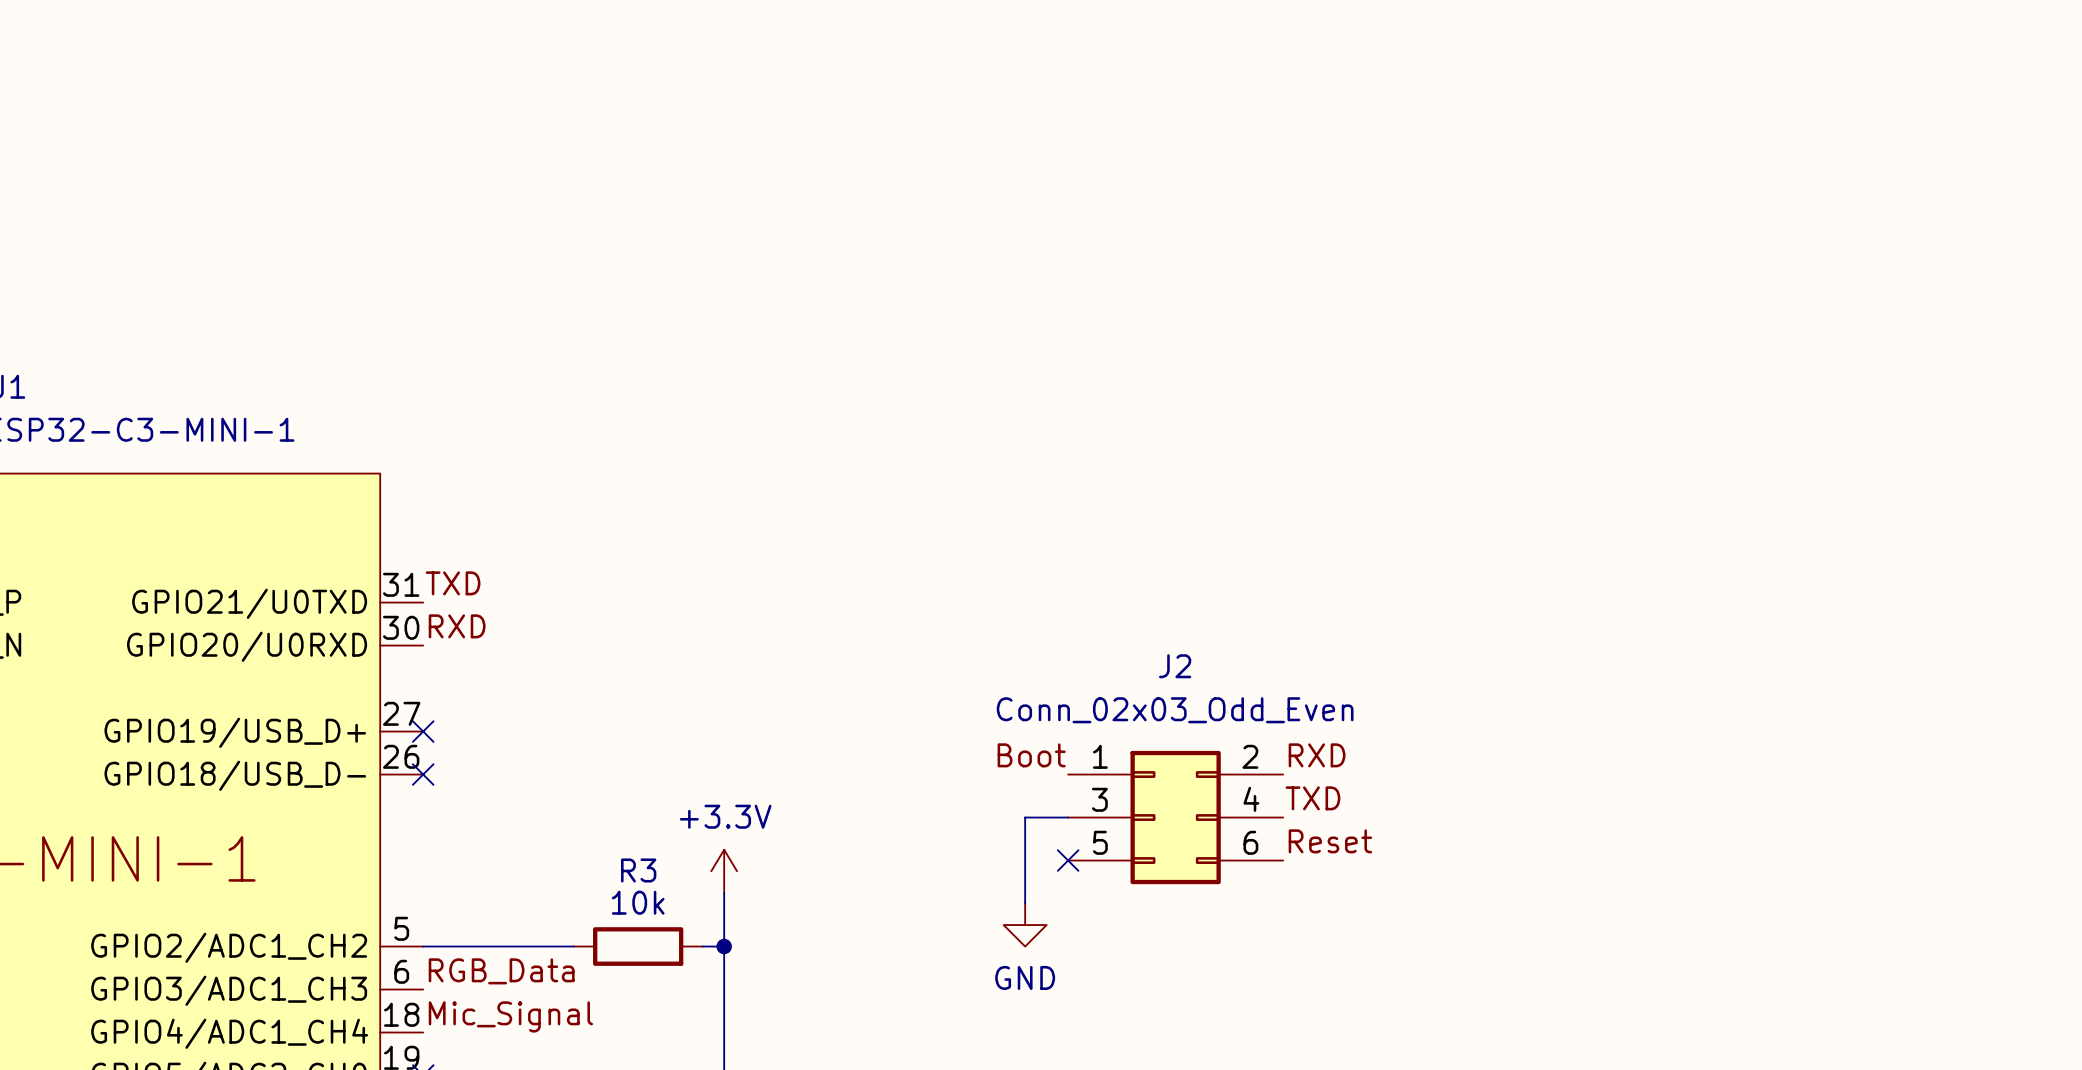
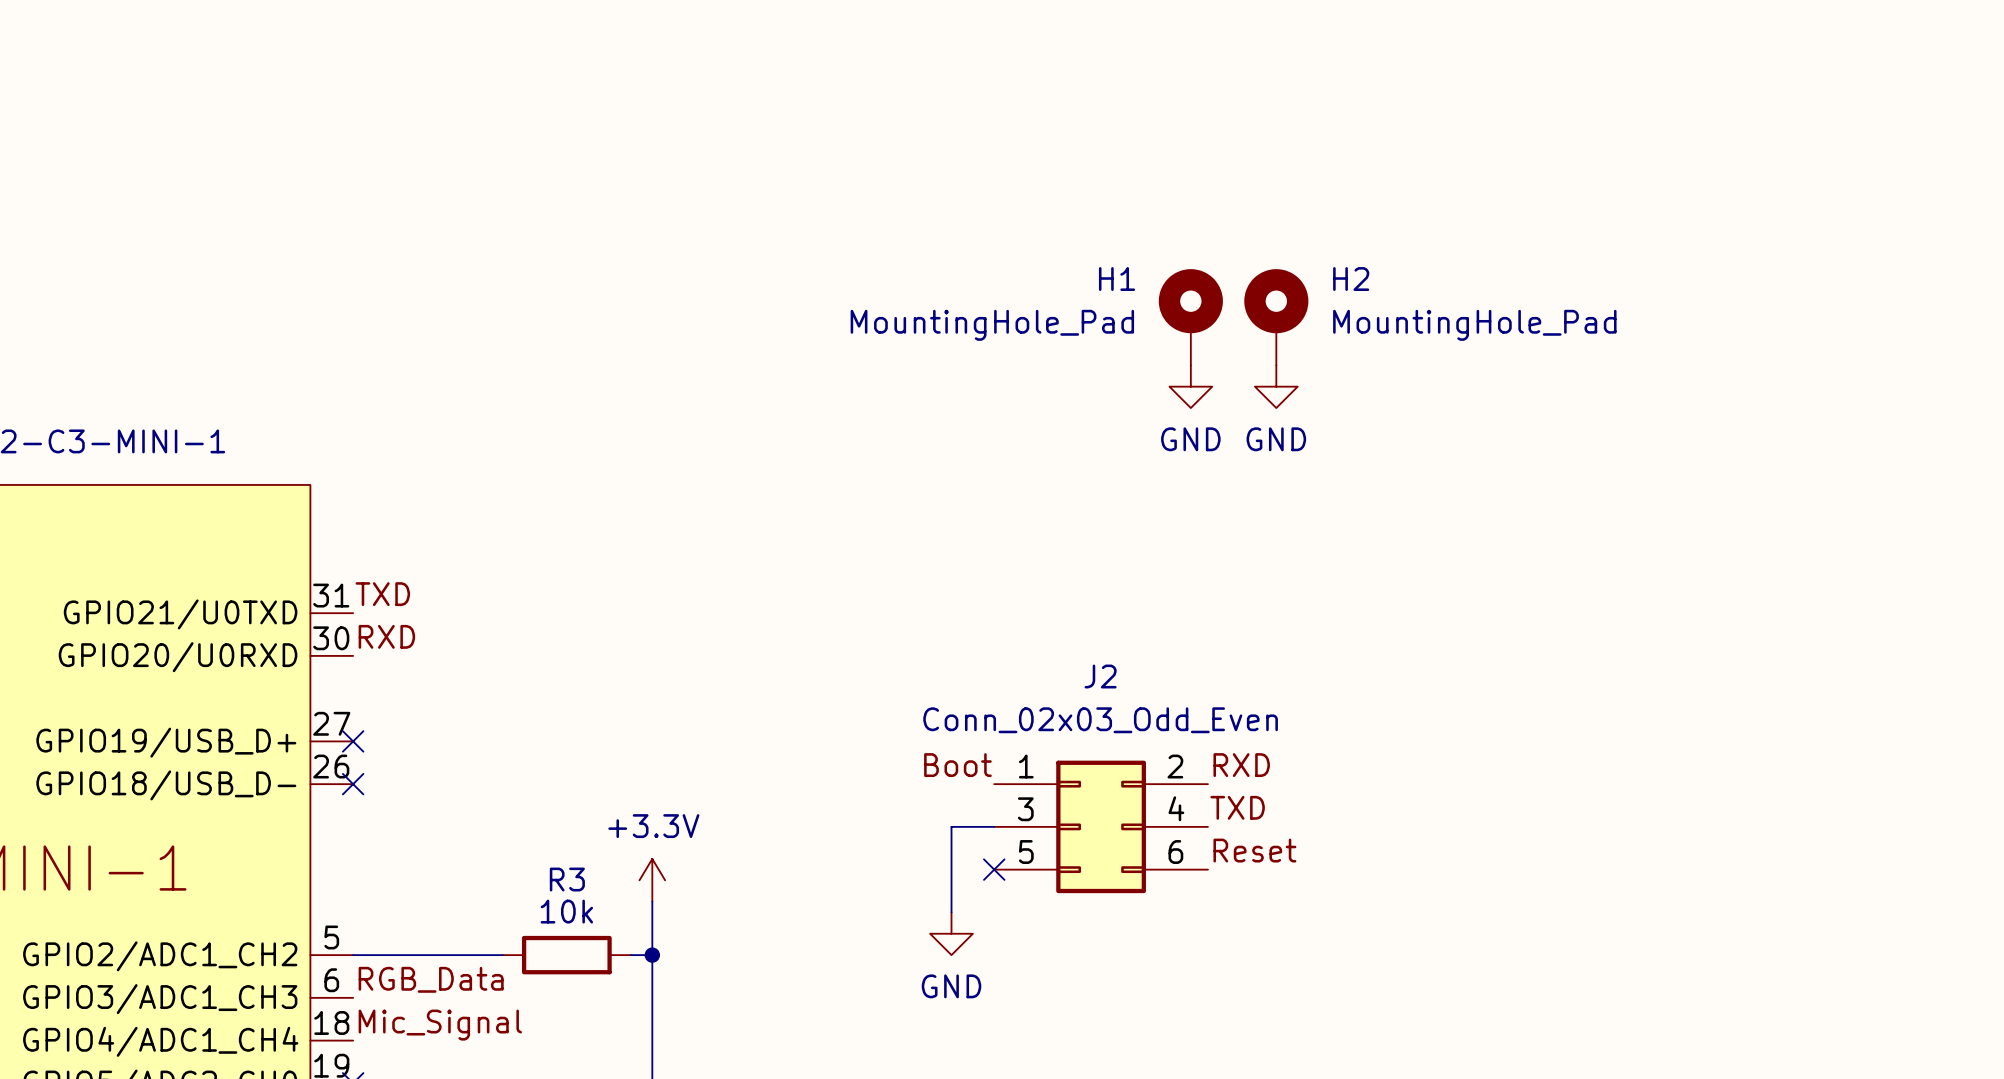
H1: none -> MountingHole_Pad (1190, 317)
H2: none -> MountingHole_Pad (1276, 317)
power symbol: none -> GND (1190, 386)
power symbol: none -> GND (1276, 386)

